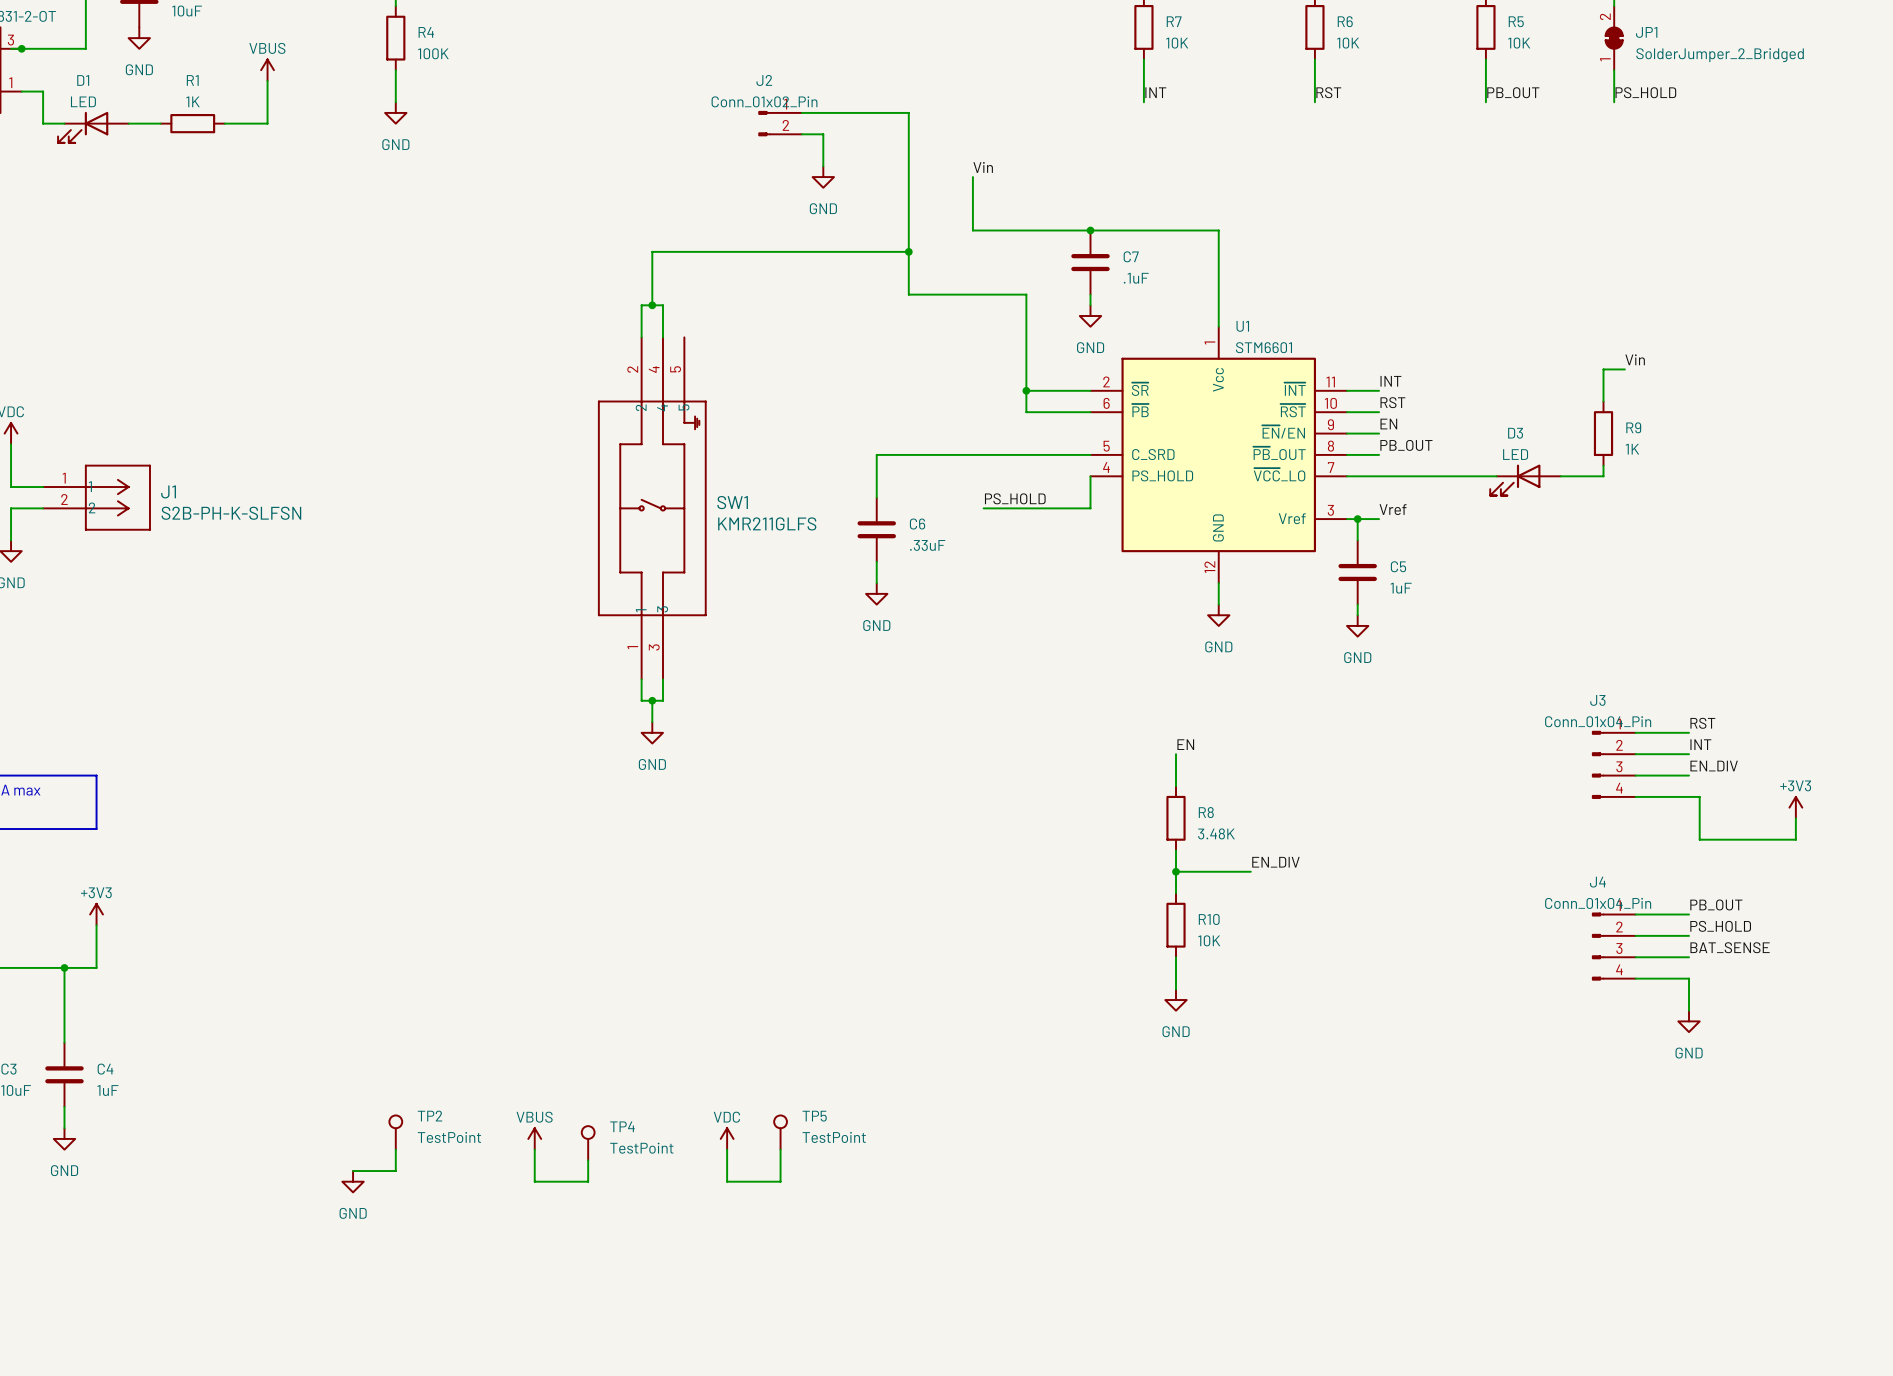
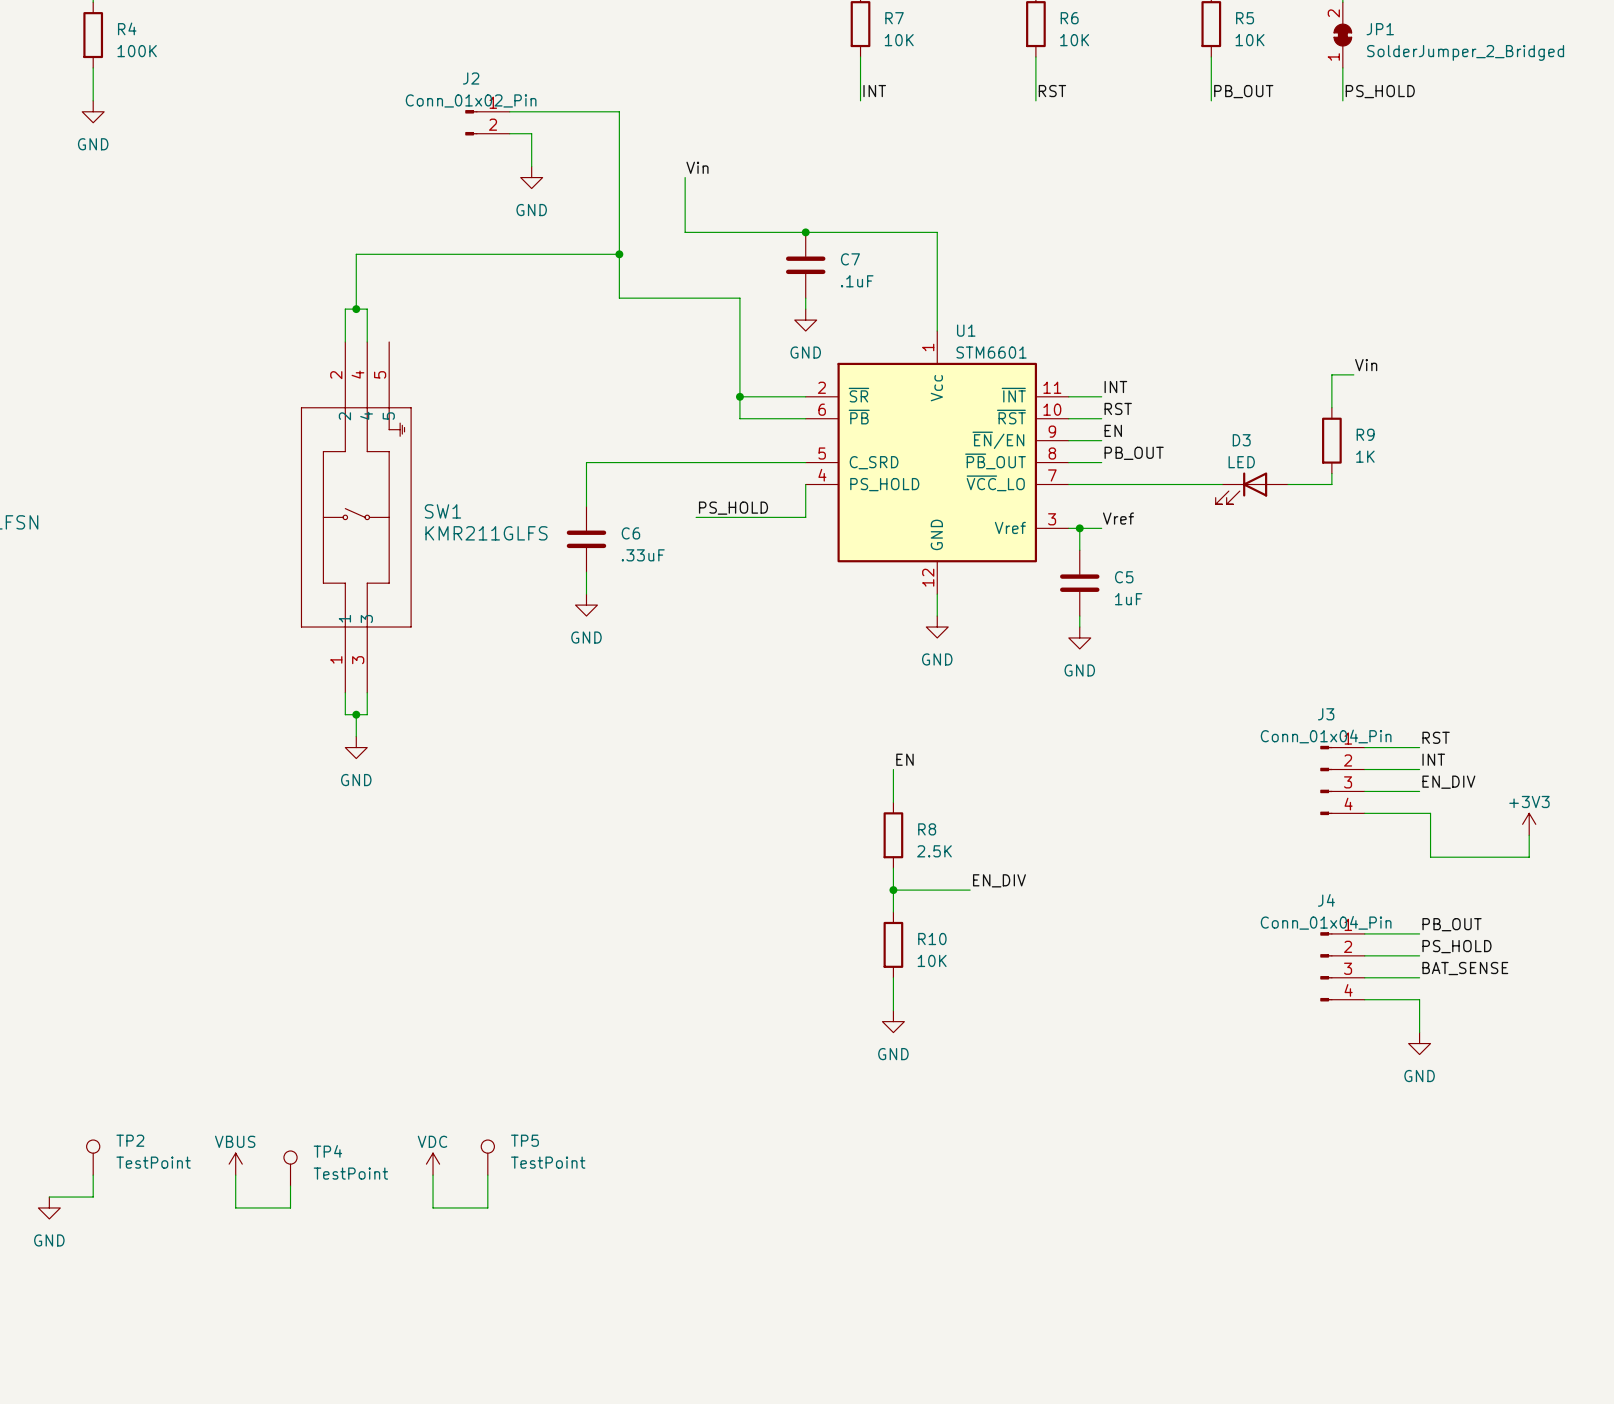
R8 value: 3.48K (1216, 833) -> 2.5K (934, 851)

